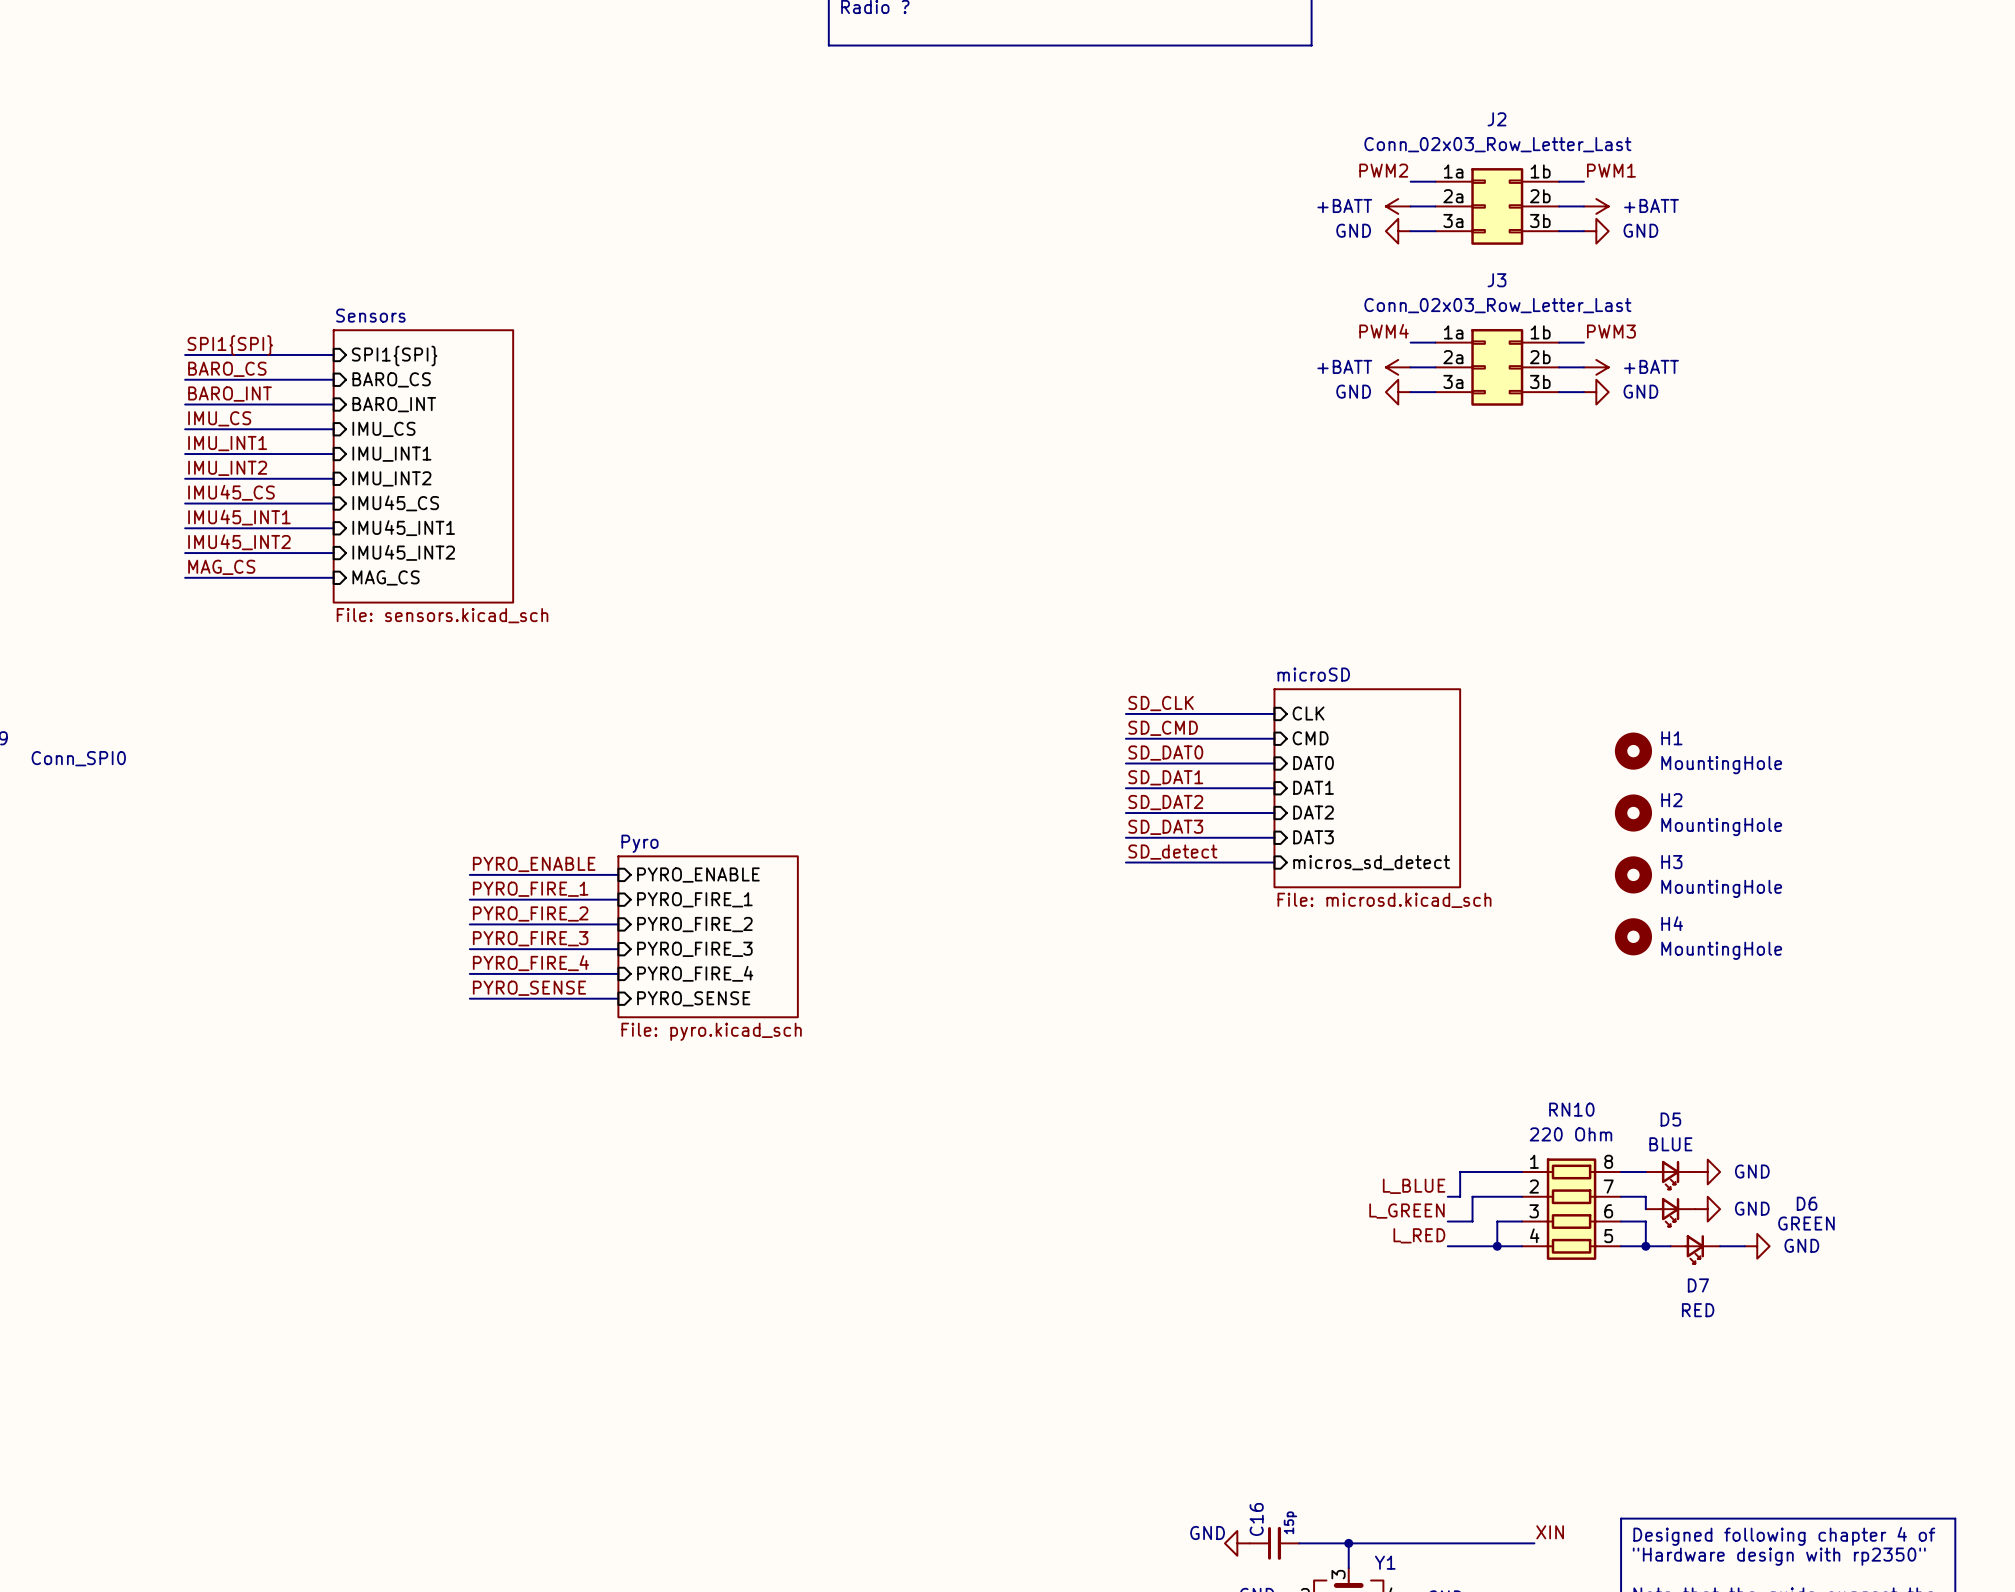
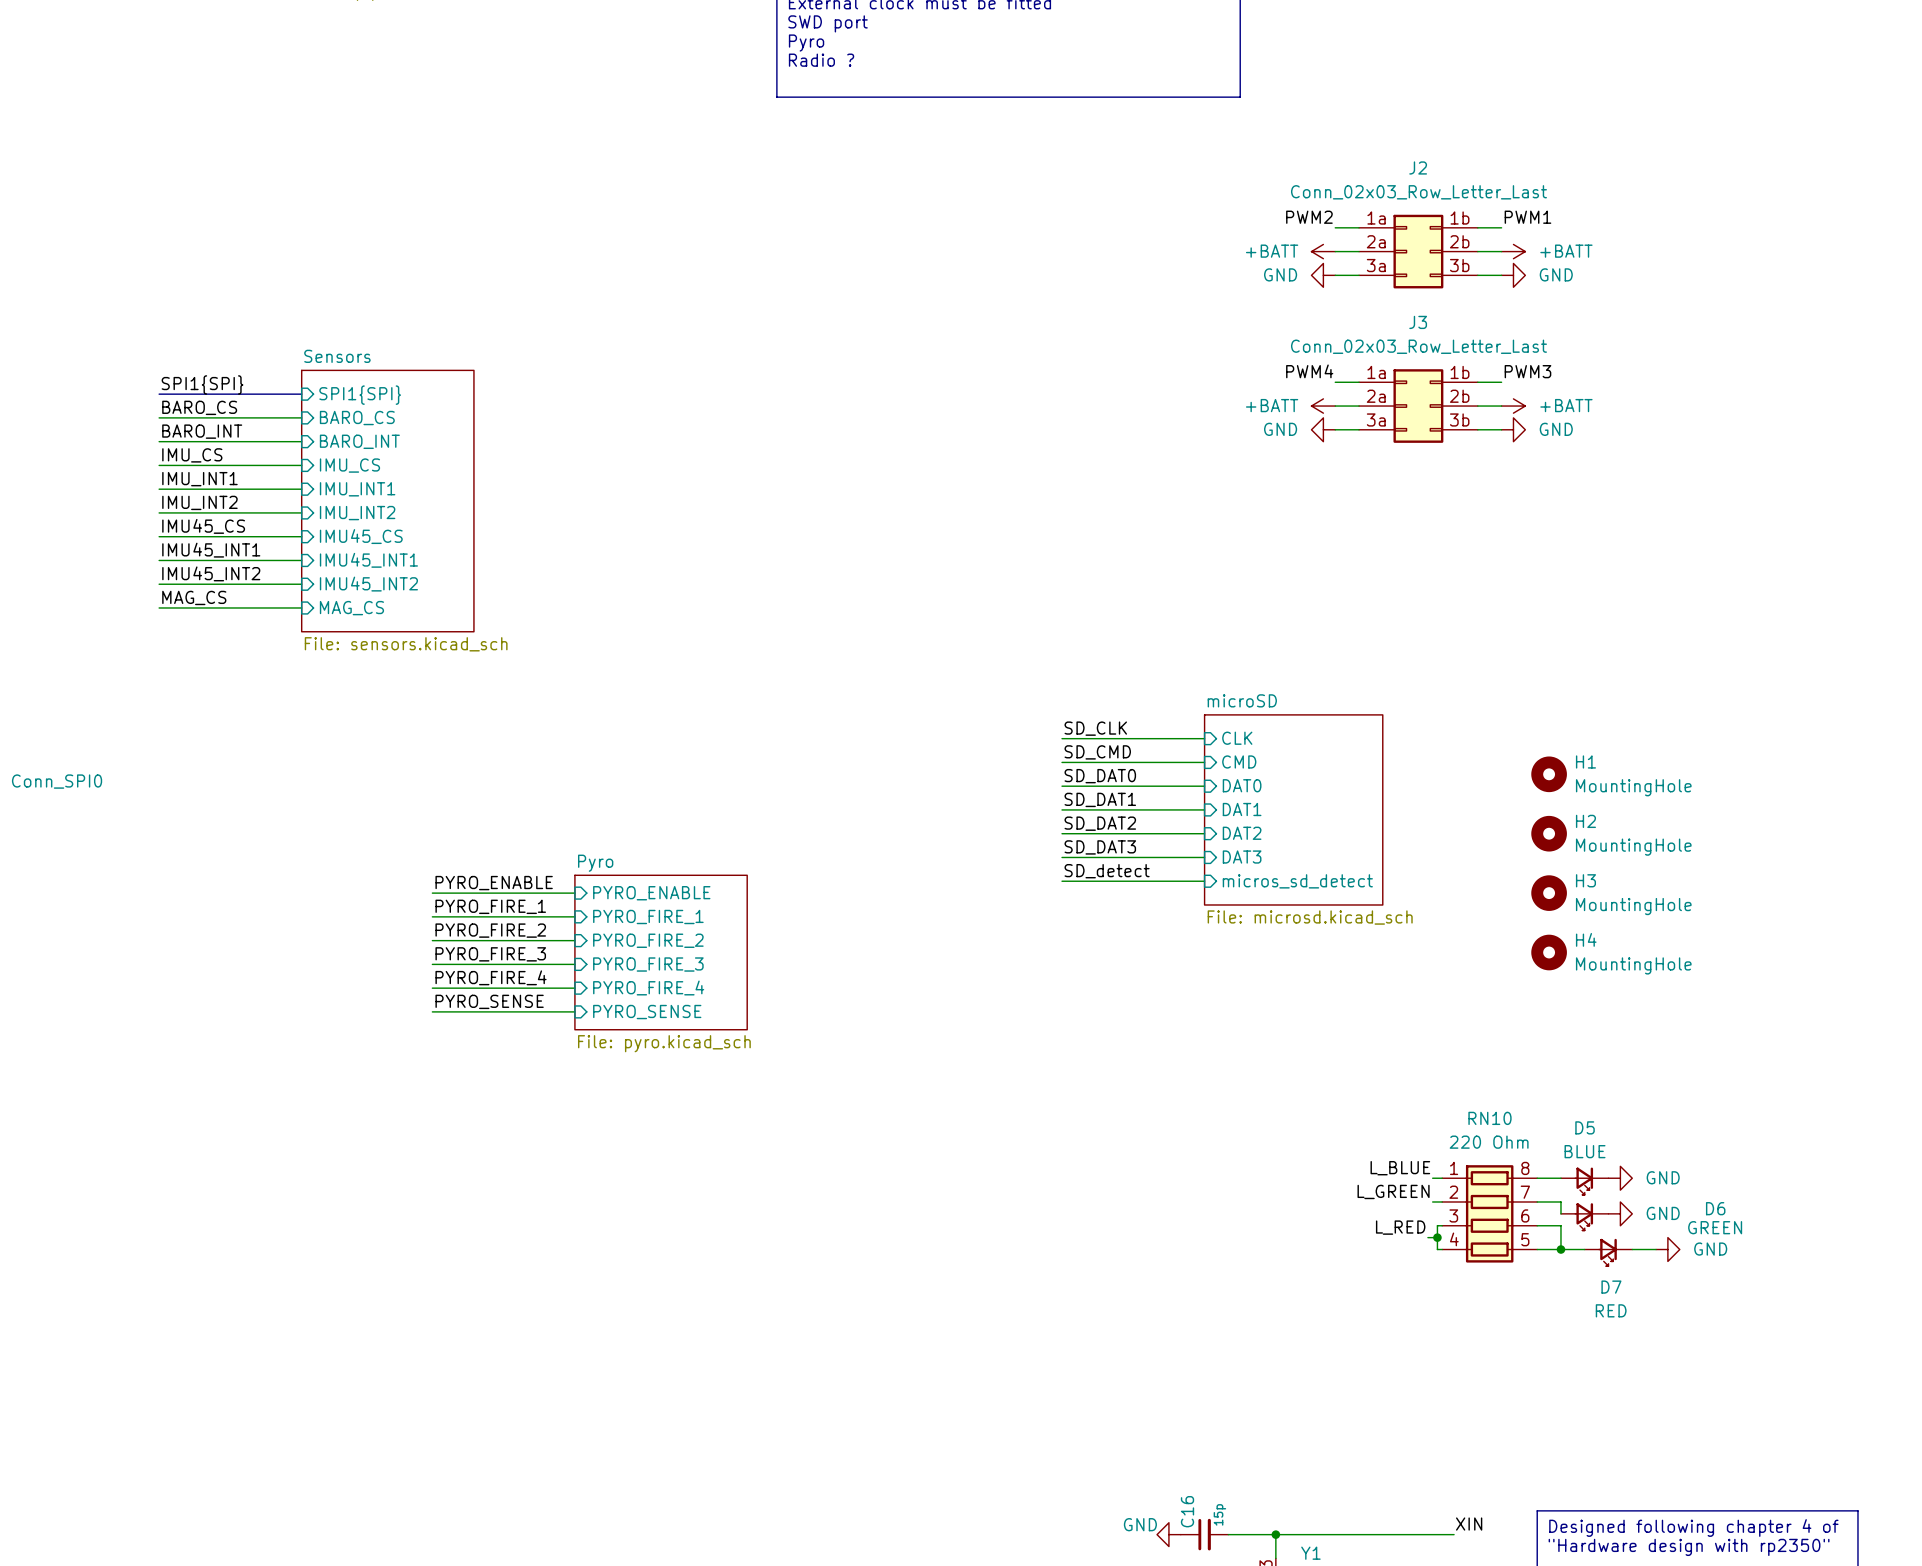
wire: (1512, 1172) (1460, 1172) (1460, 1196) (1447, 1196) -> none
label position: L_BLUE (1414, 1186) -> L_BLUE (1400, 1168)
wire: (1512, 1196) (1472, 1196) (1472, 1221) (1447, 1221) -> none
label position: L_GREEN (1407, 1211) -> L_GREEN (1393, 1191)
wire: (1517, 1221) (1497, 1221) (1497, 1246) -> (1437, 1225) (1437, 1249)
wire: none -> (1427, 1237) (1437, 1237)
label position: L_RED (1419, 1235) -> L_RED (1400, 1227)
wire: (1447, 1246) (1517, 1246) -> none
junction position: (1497, 1246) -> (1437, 1237)

